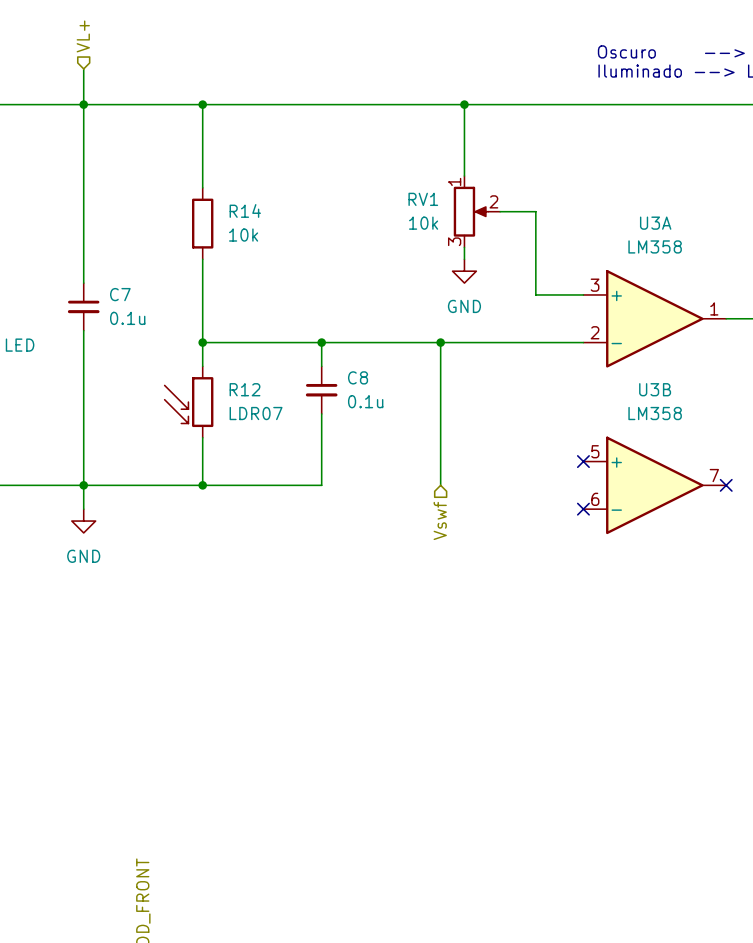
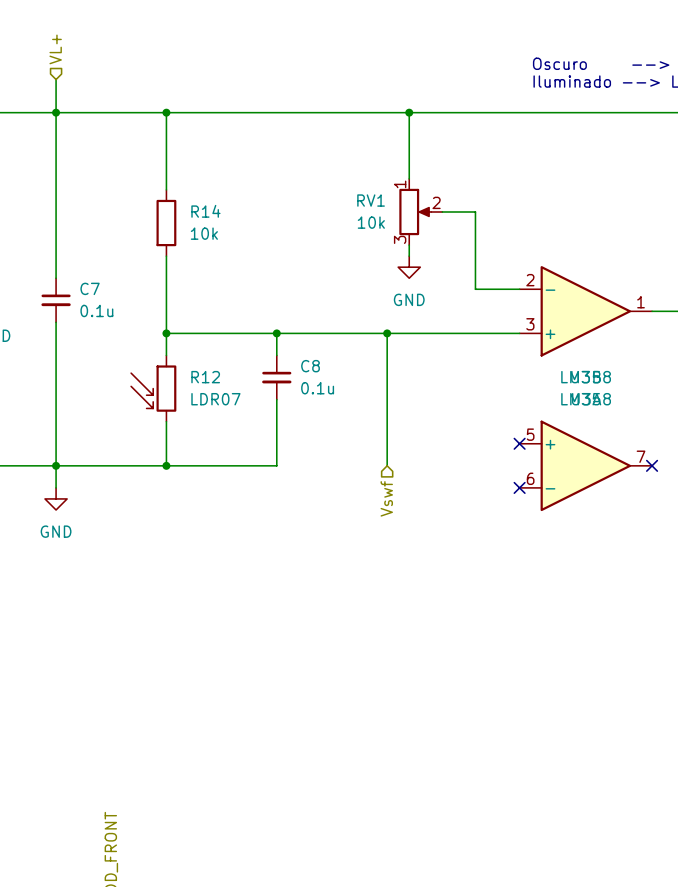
U3A flip: as is (654, 318) -> up-down (585, 311)

